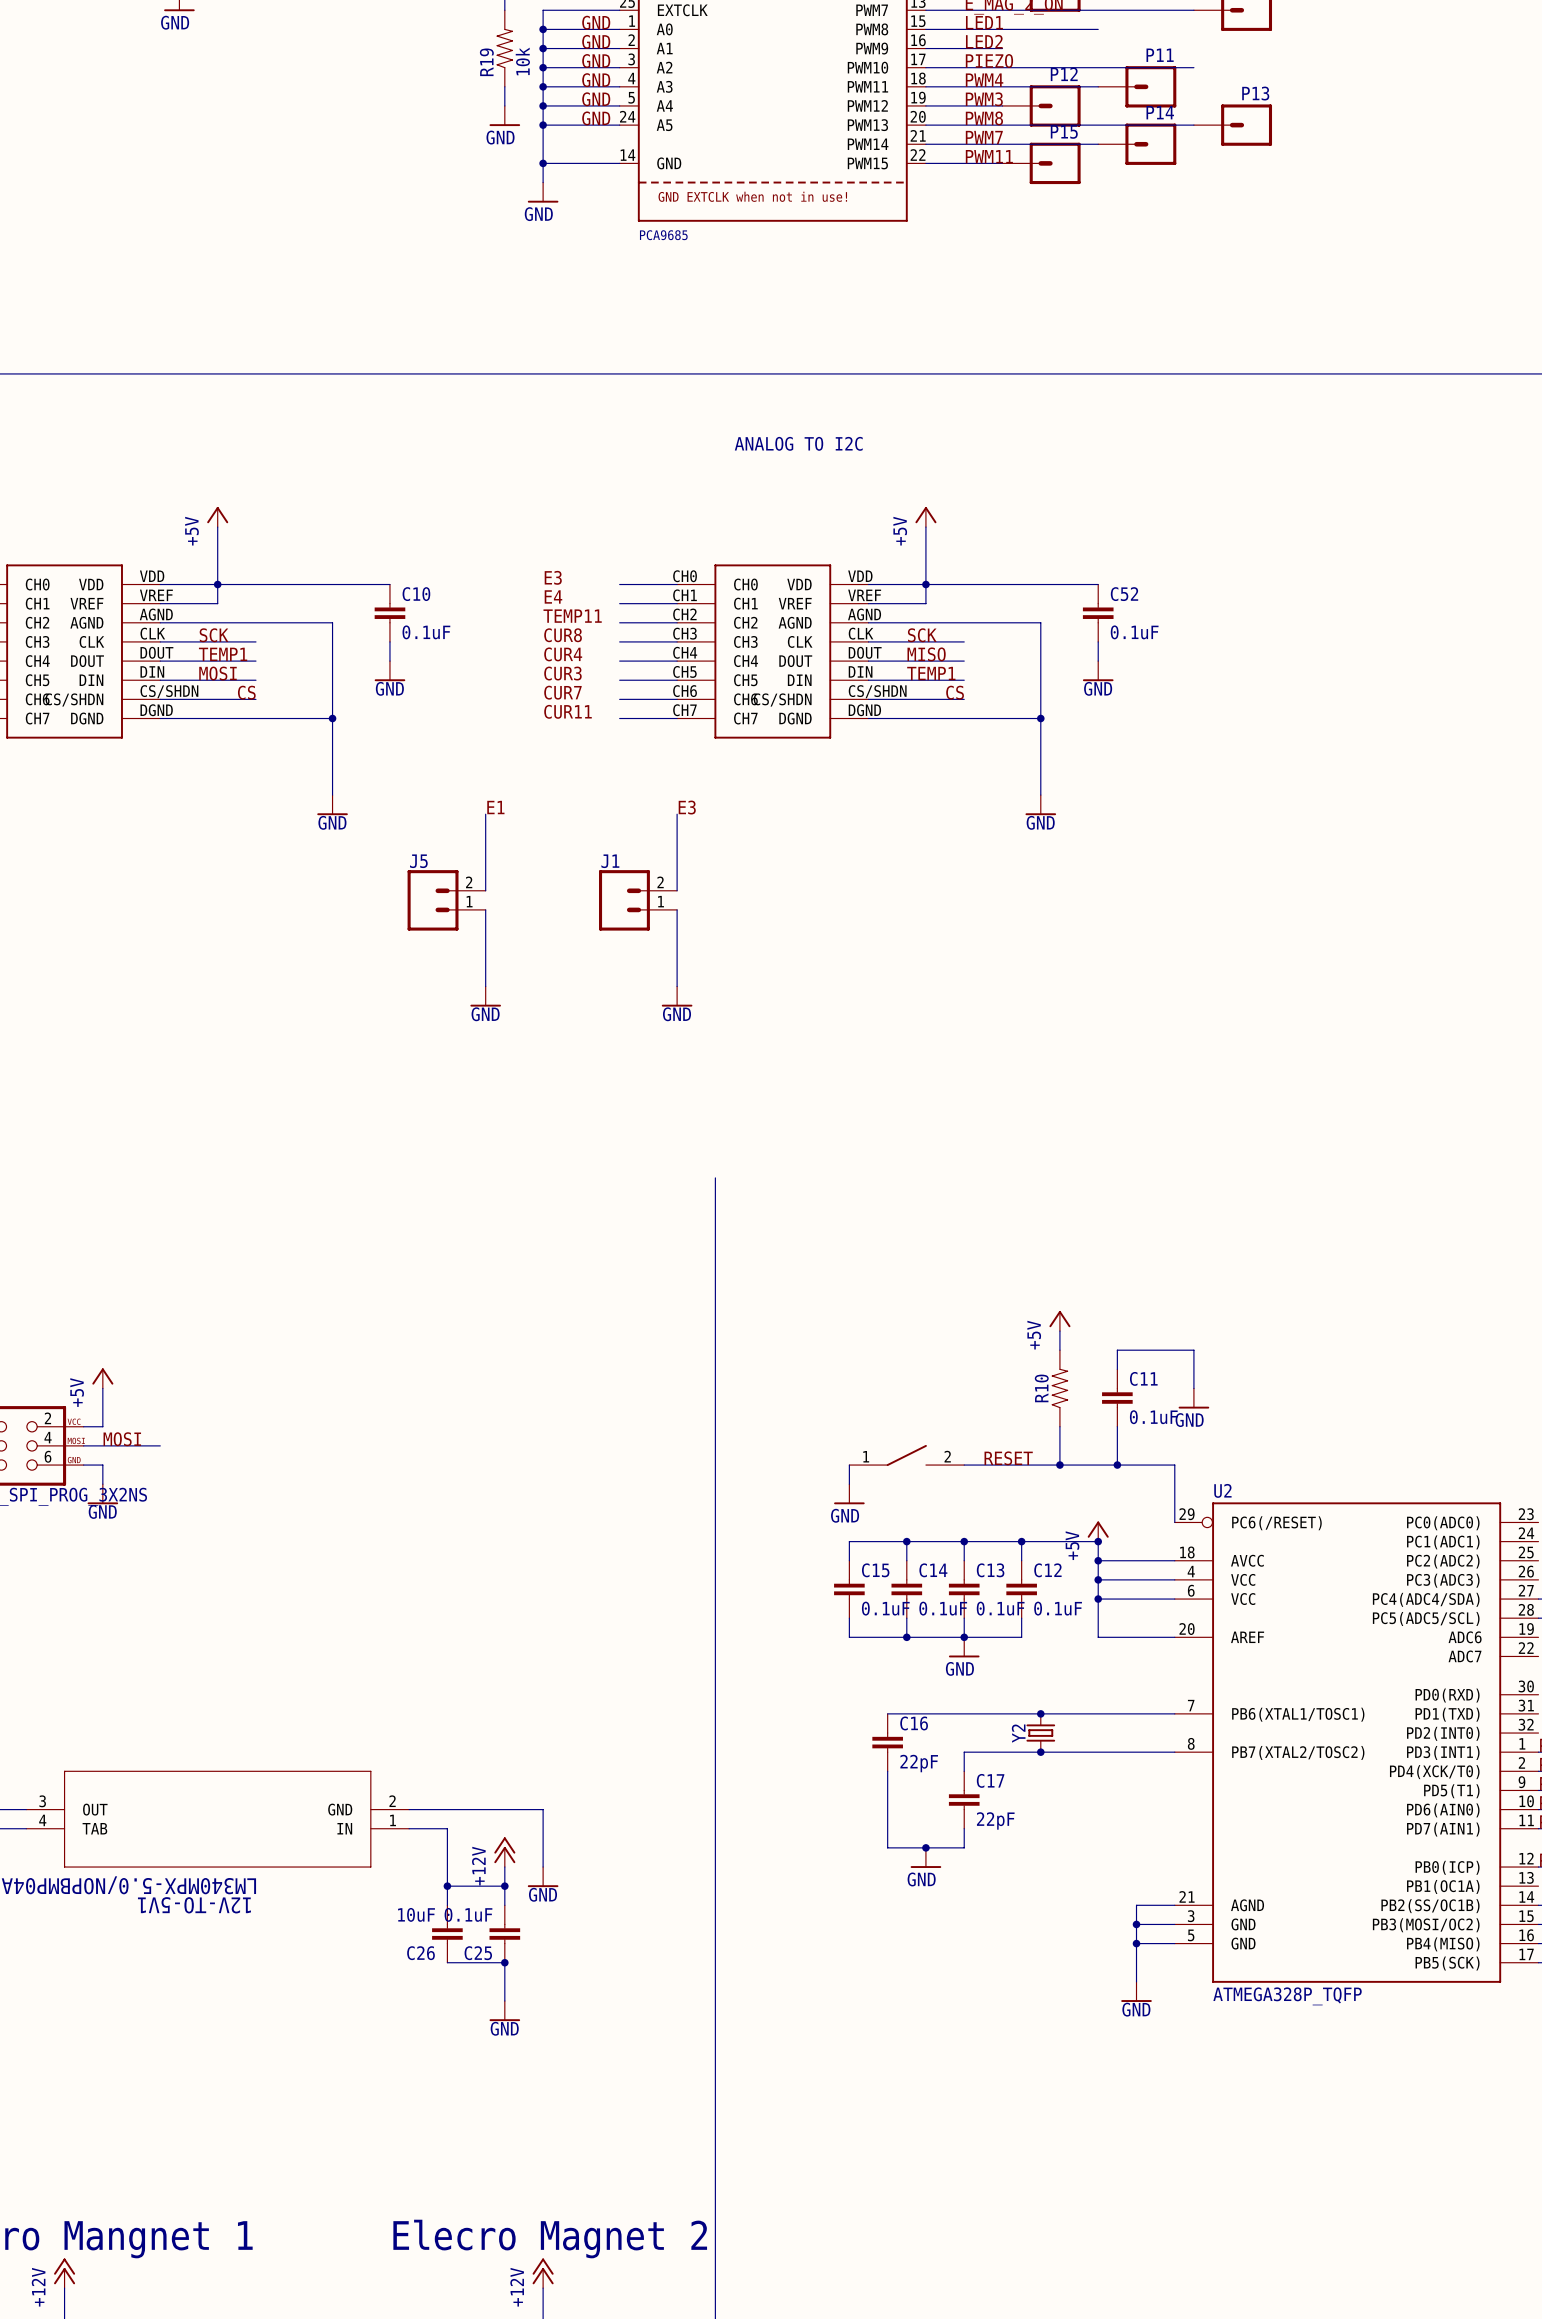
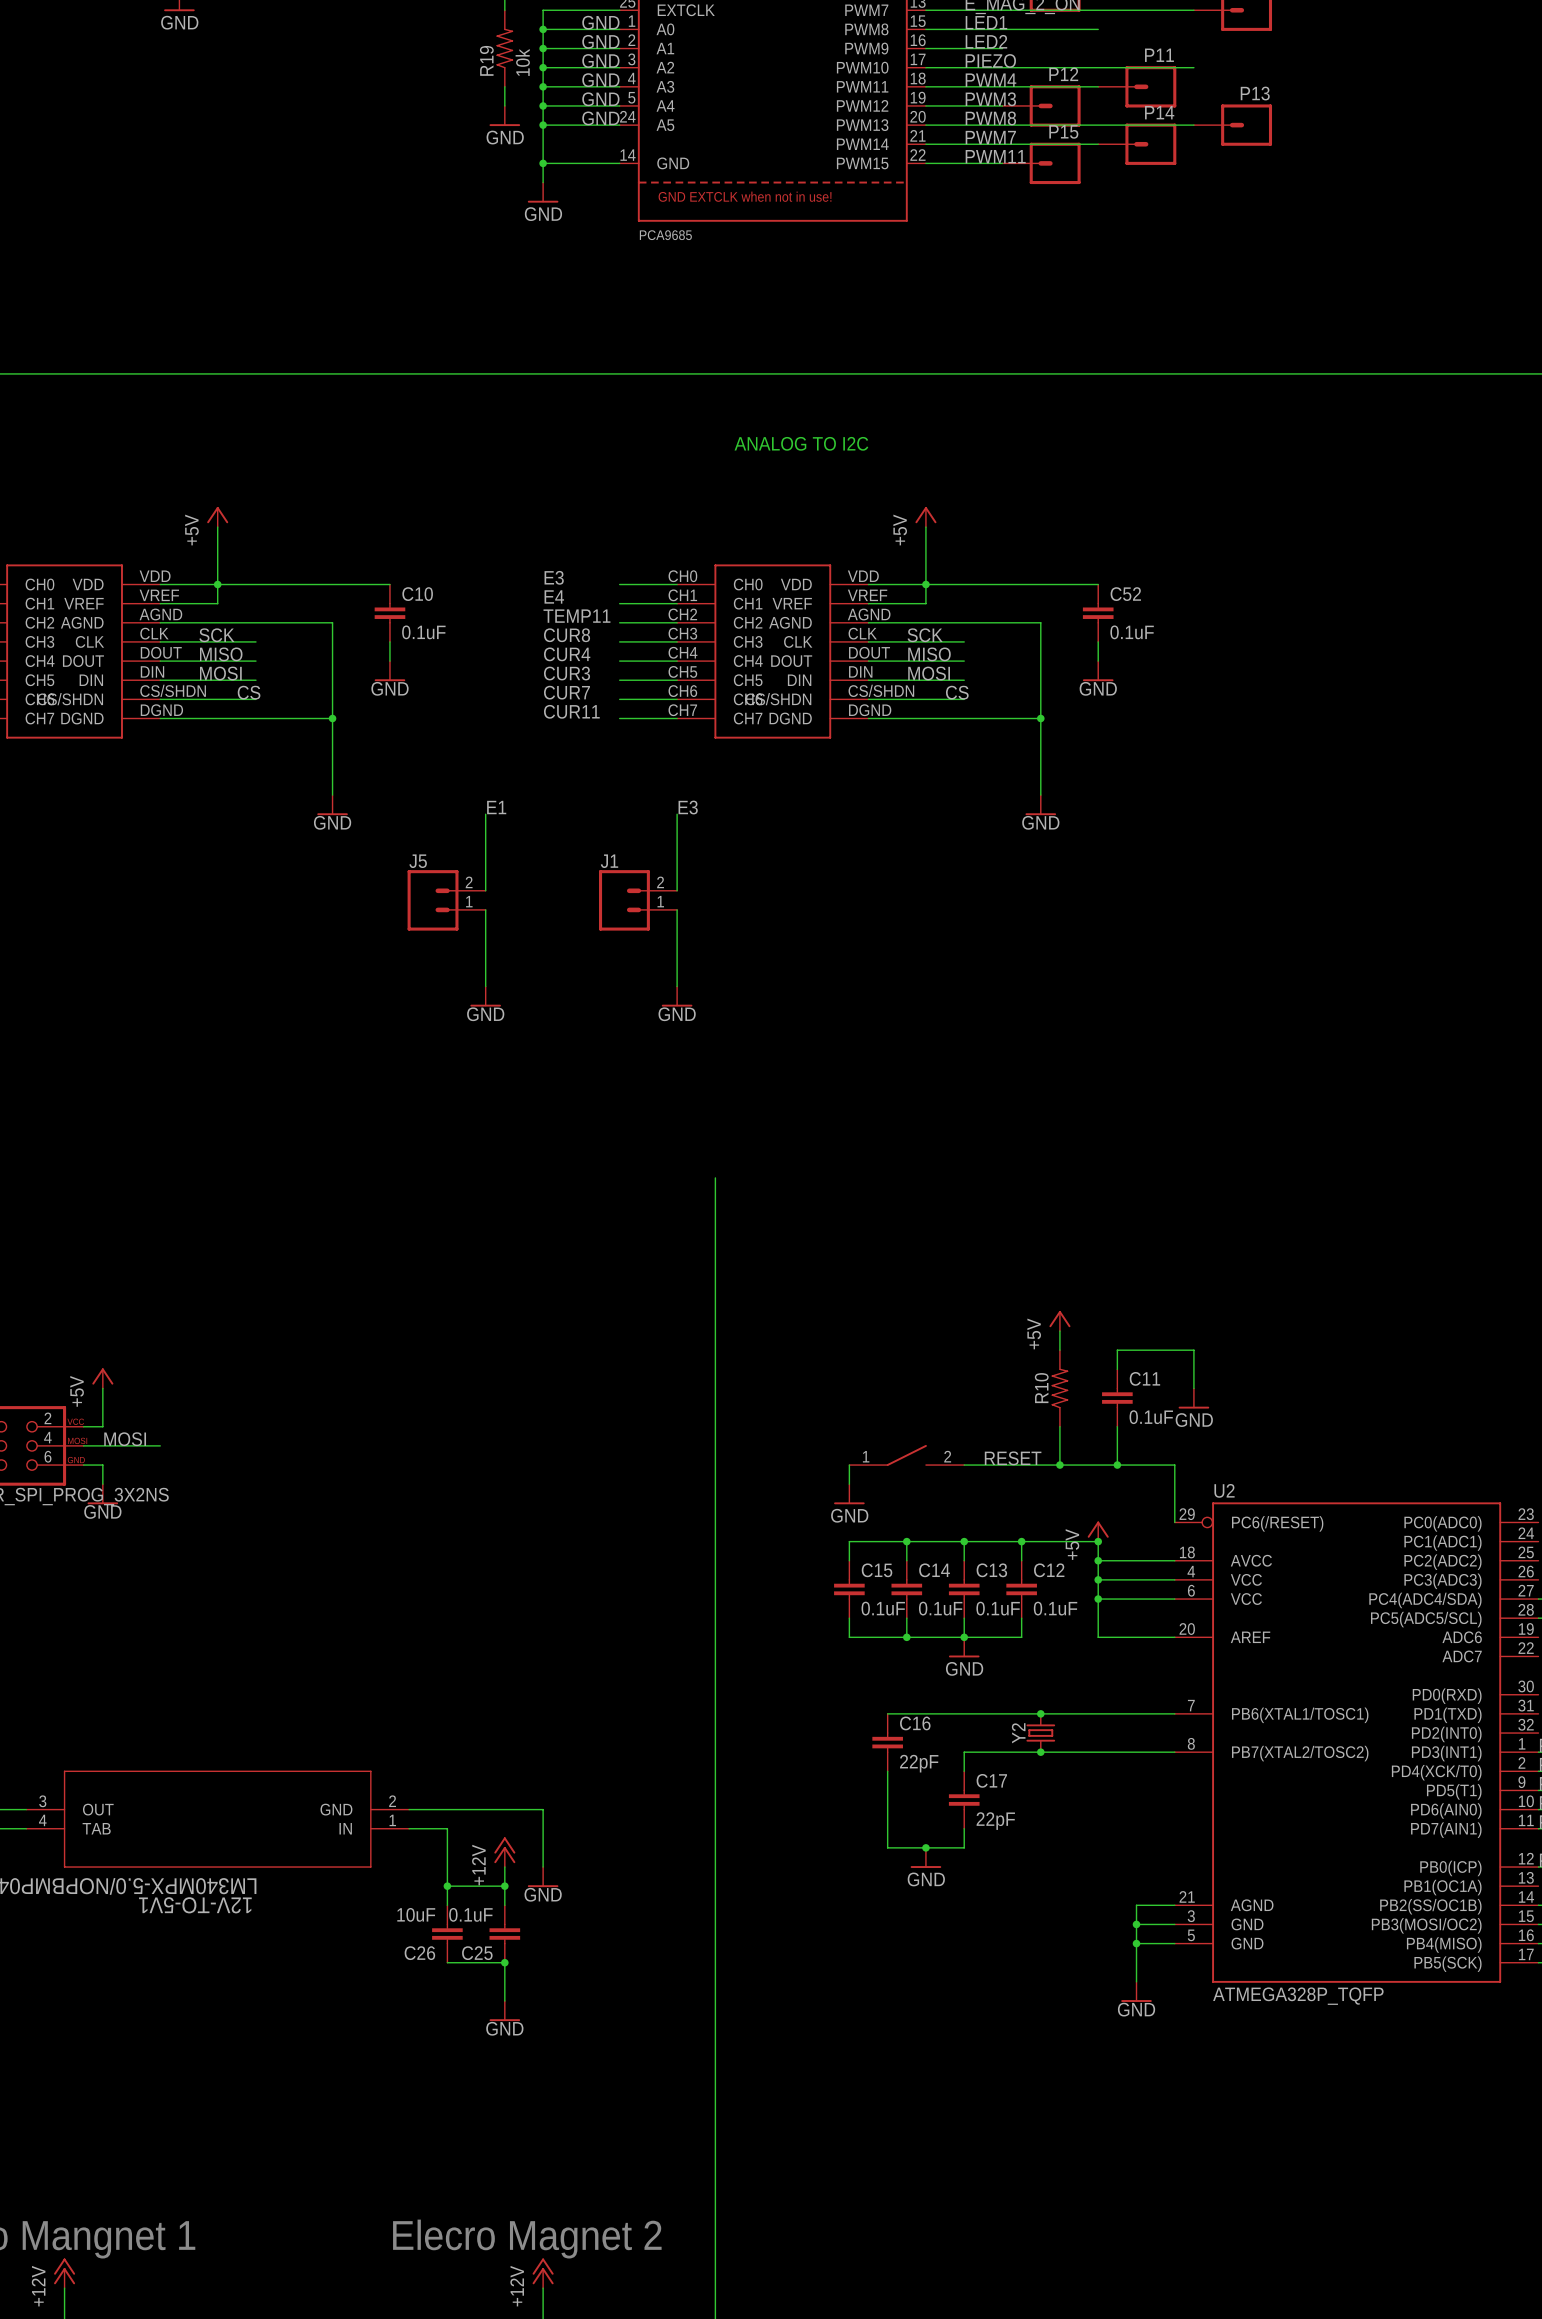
label: TEMP1 (223, 654) -> MISO (221, 654)
label: TEMP1 (931, 673) -> MOSI (929, 673)

